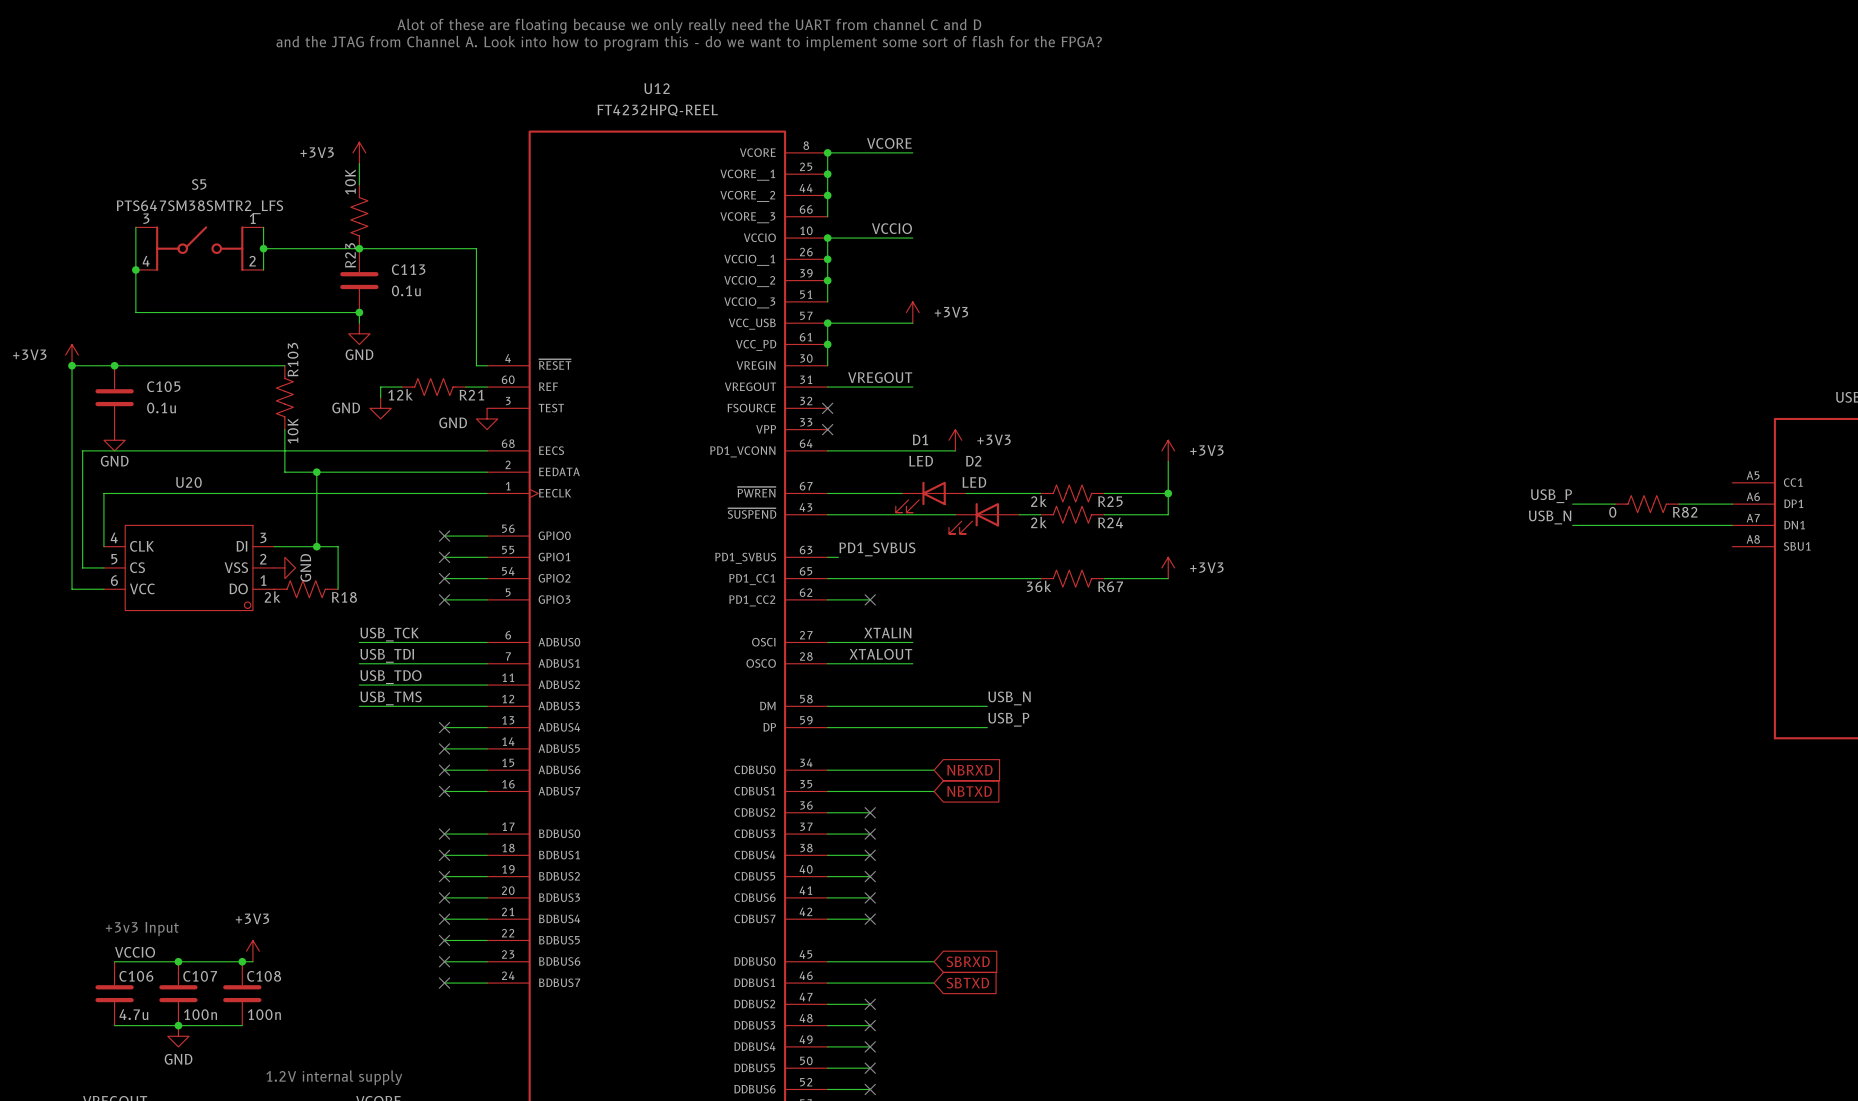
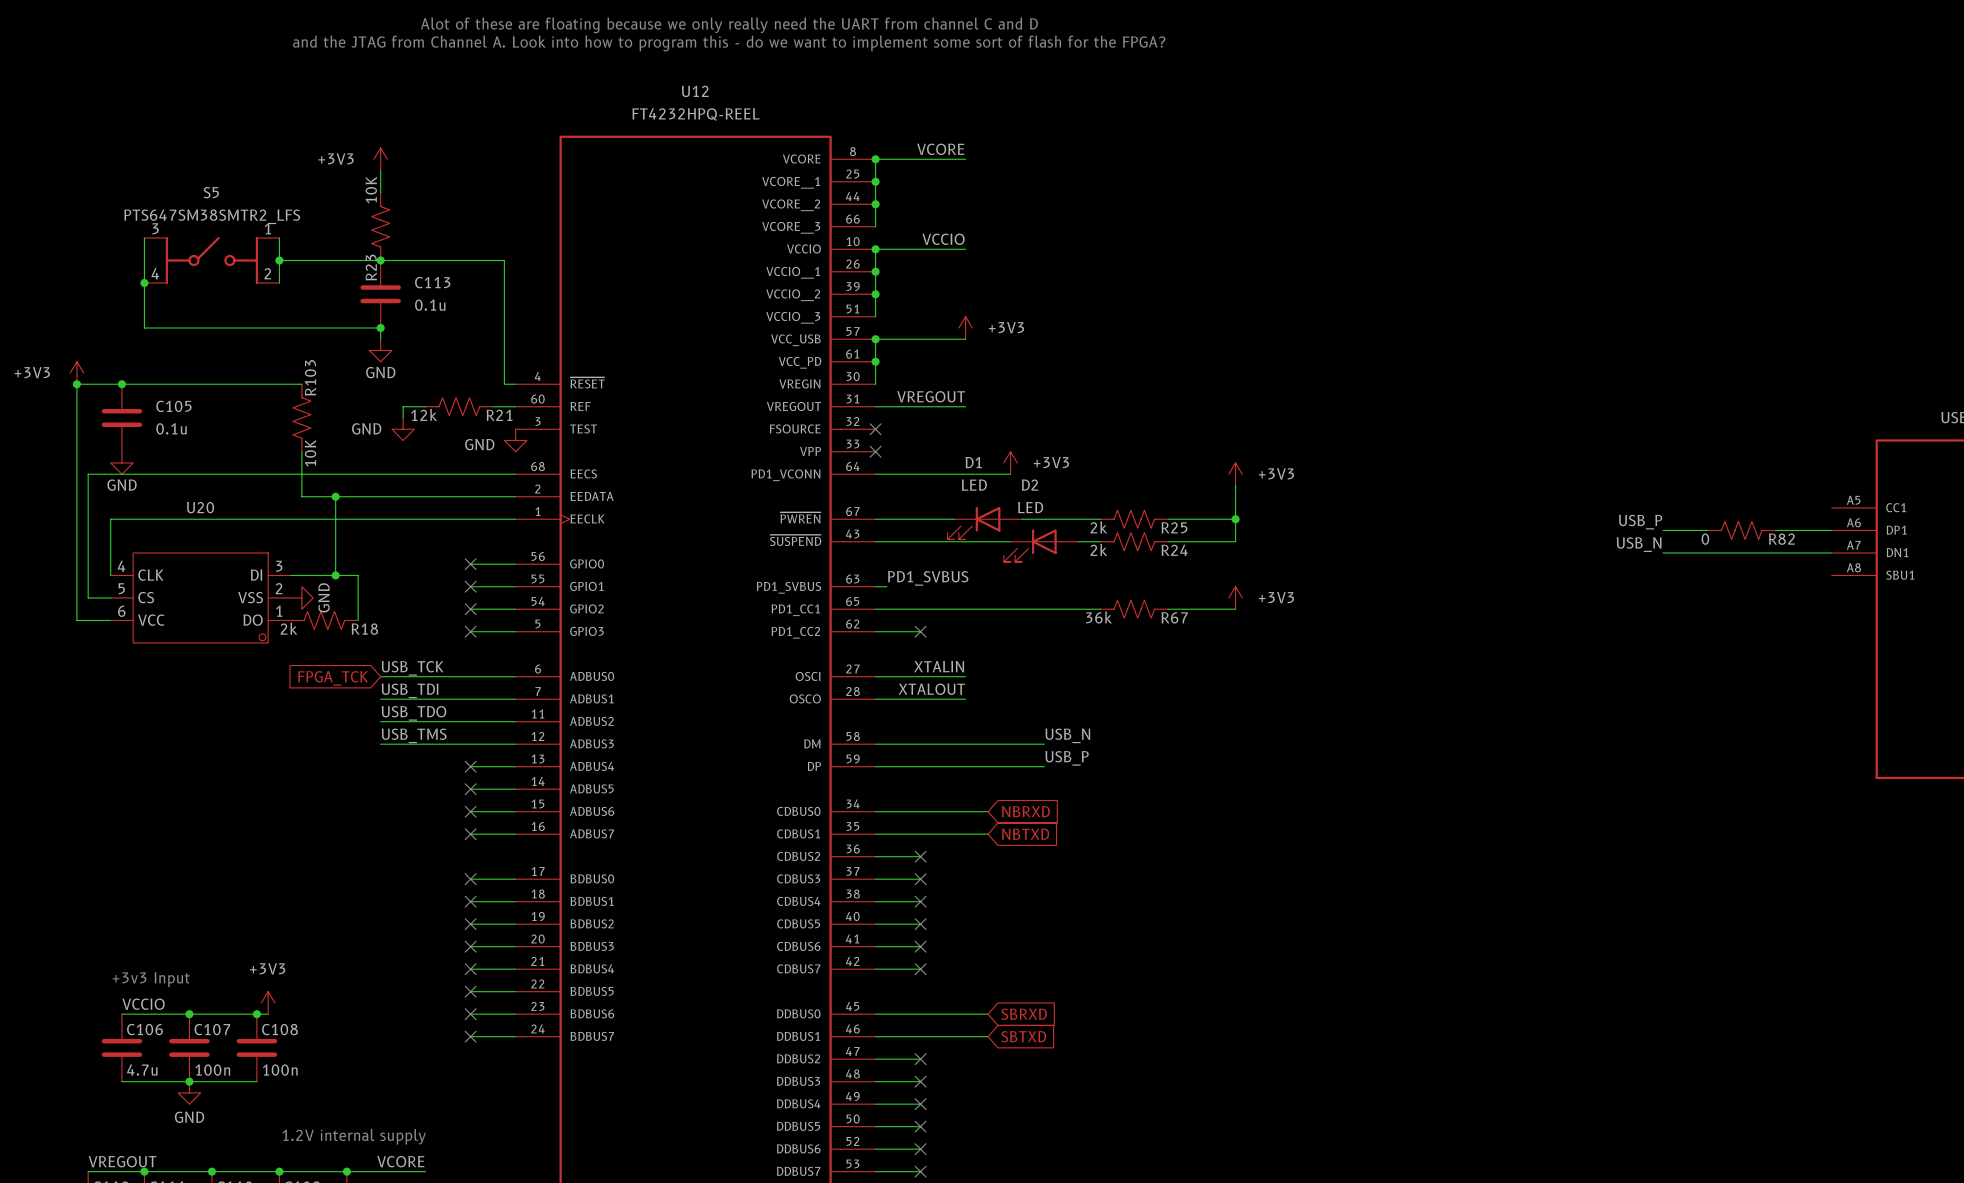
global label: none -> FPGA_TCK (333, 678)

